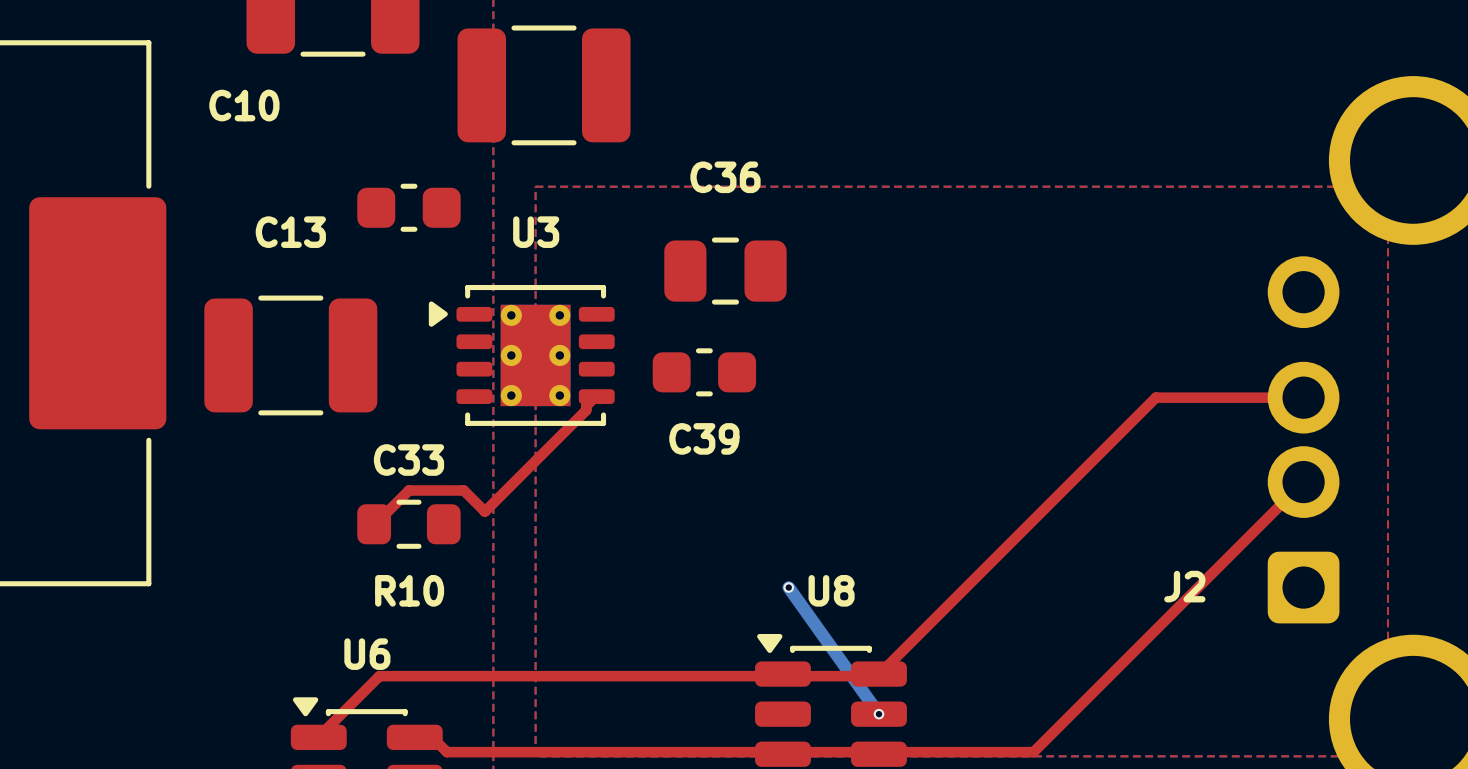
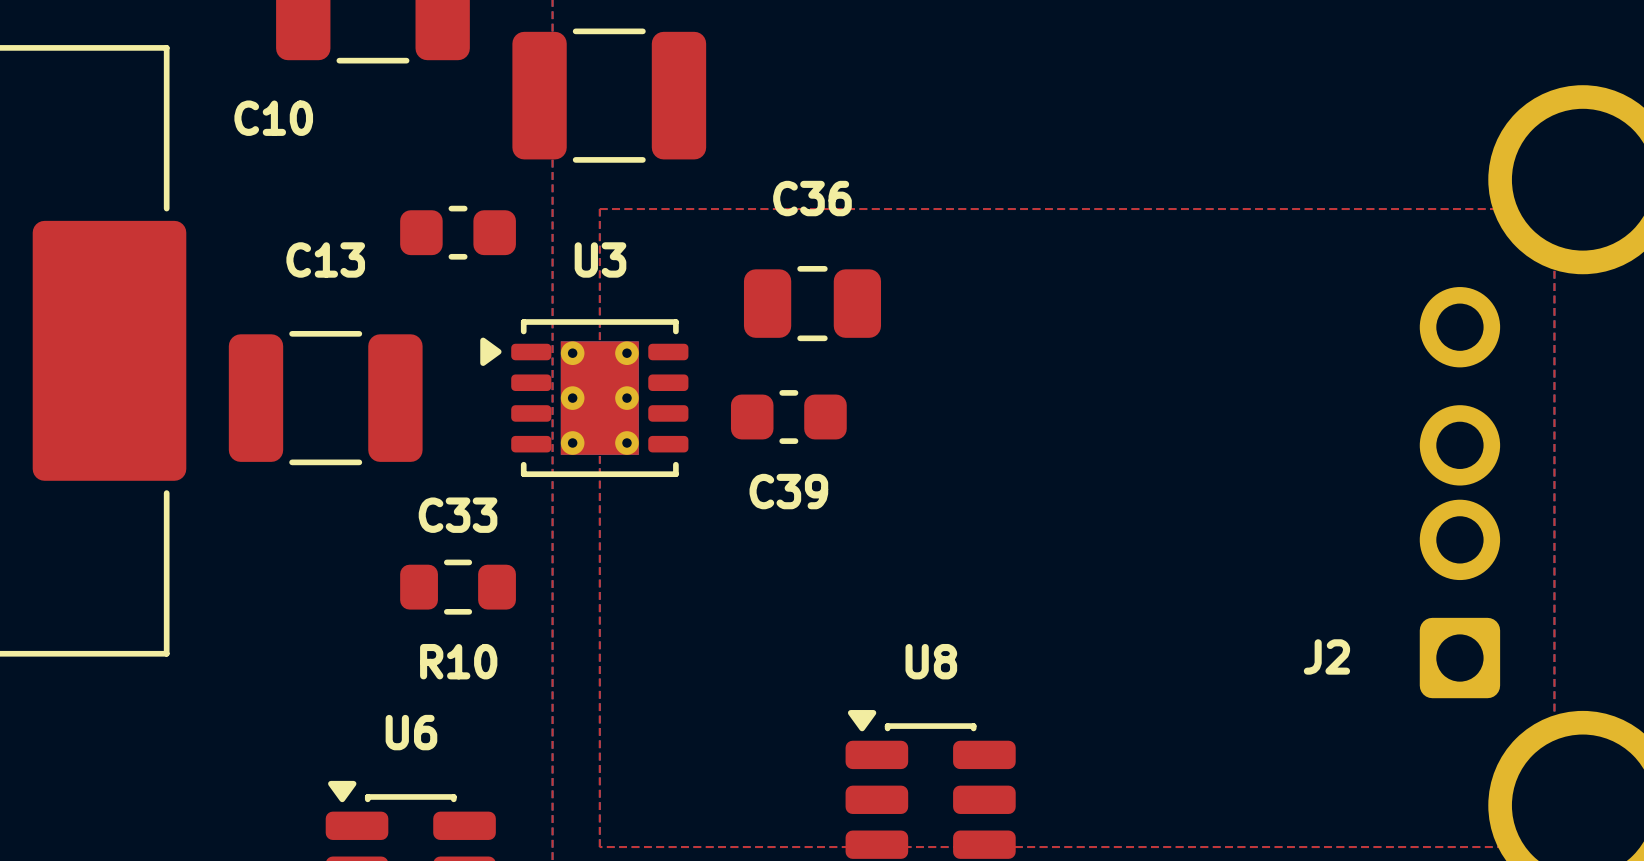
top track: (596, 396) (586, 406) (586, 410) (484, 511) (463, 490) (408, 490) (374, 524) -> none
top track: (1303, 397) (1155, 397) (877, 676) -> none
top track: (1303, 482) (1033, 752) (446, 752) (430, 735) (413, 735) (414, 737) -> none
bottom track: (788, 587) (878, 714) -> none
via: (788, 587) -> none
top track: (877, 676) (379, 676) (318, 737) -> none
via: (878, 714) -> none

